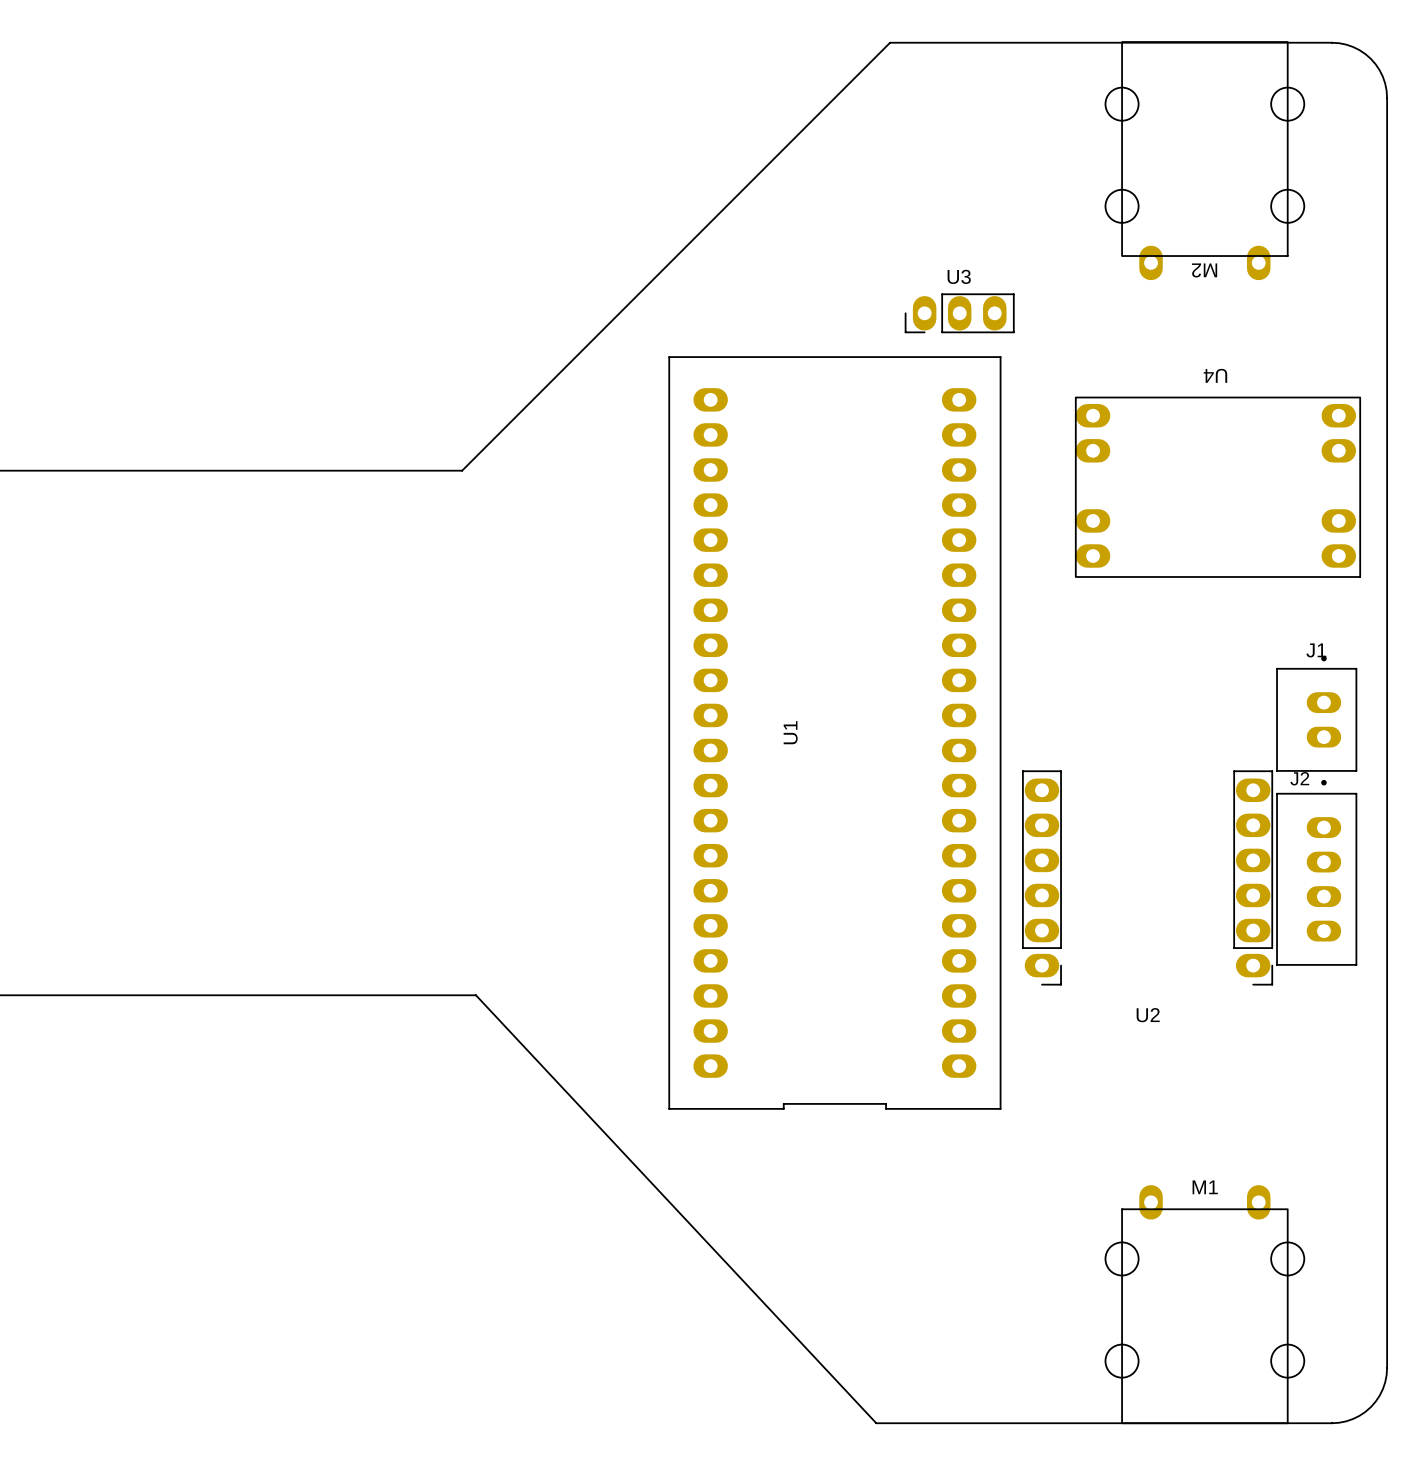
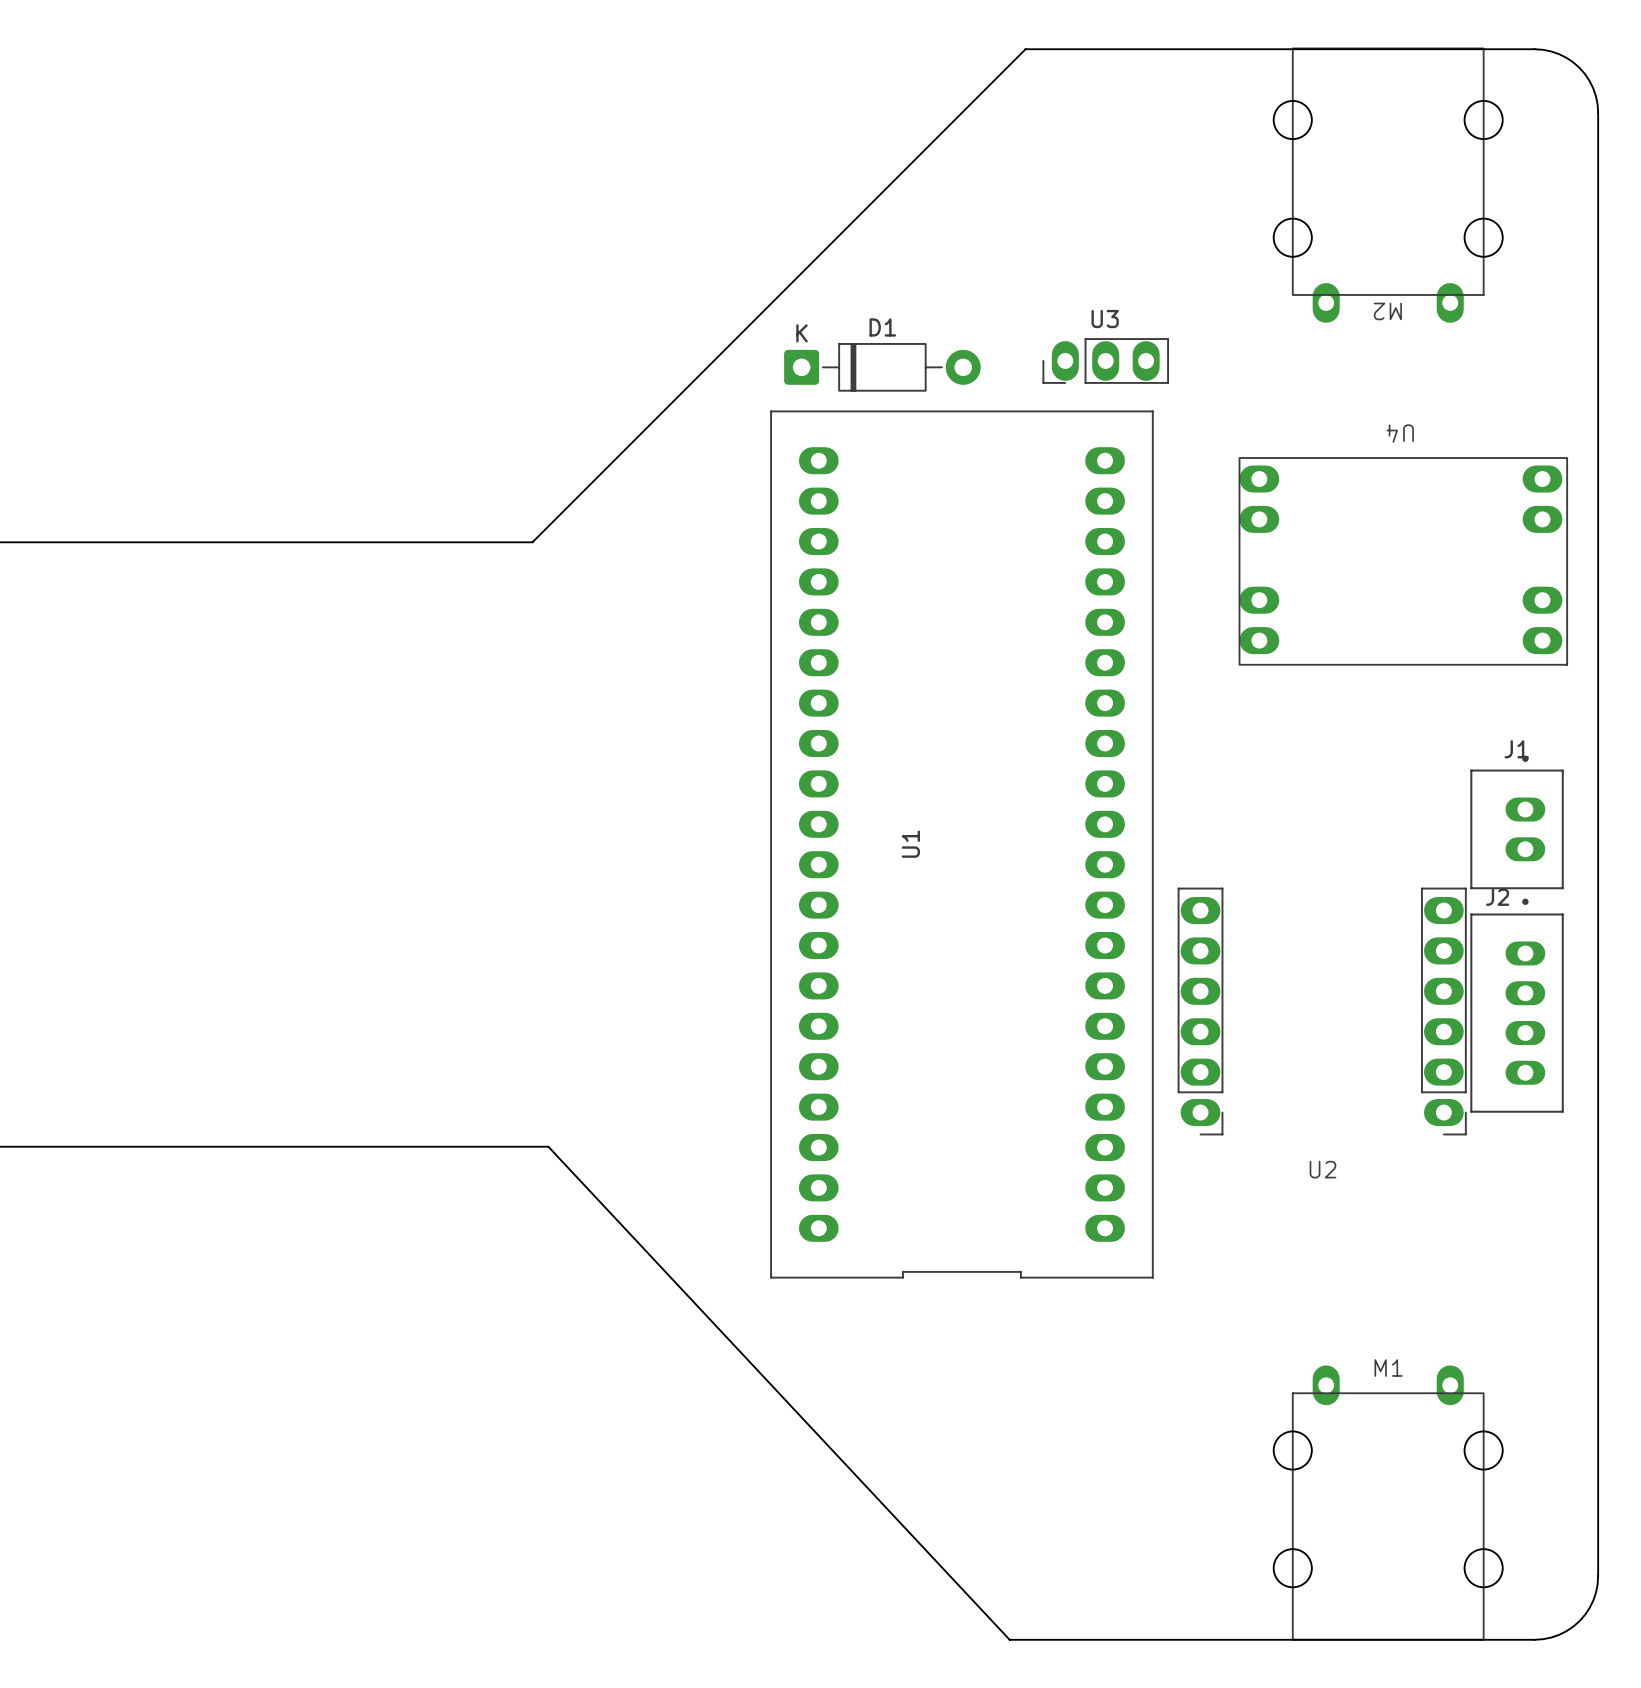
D1: none -> (882, 367)

